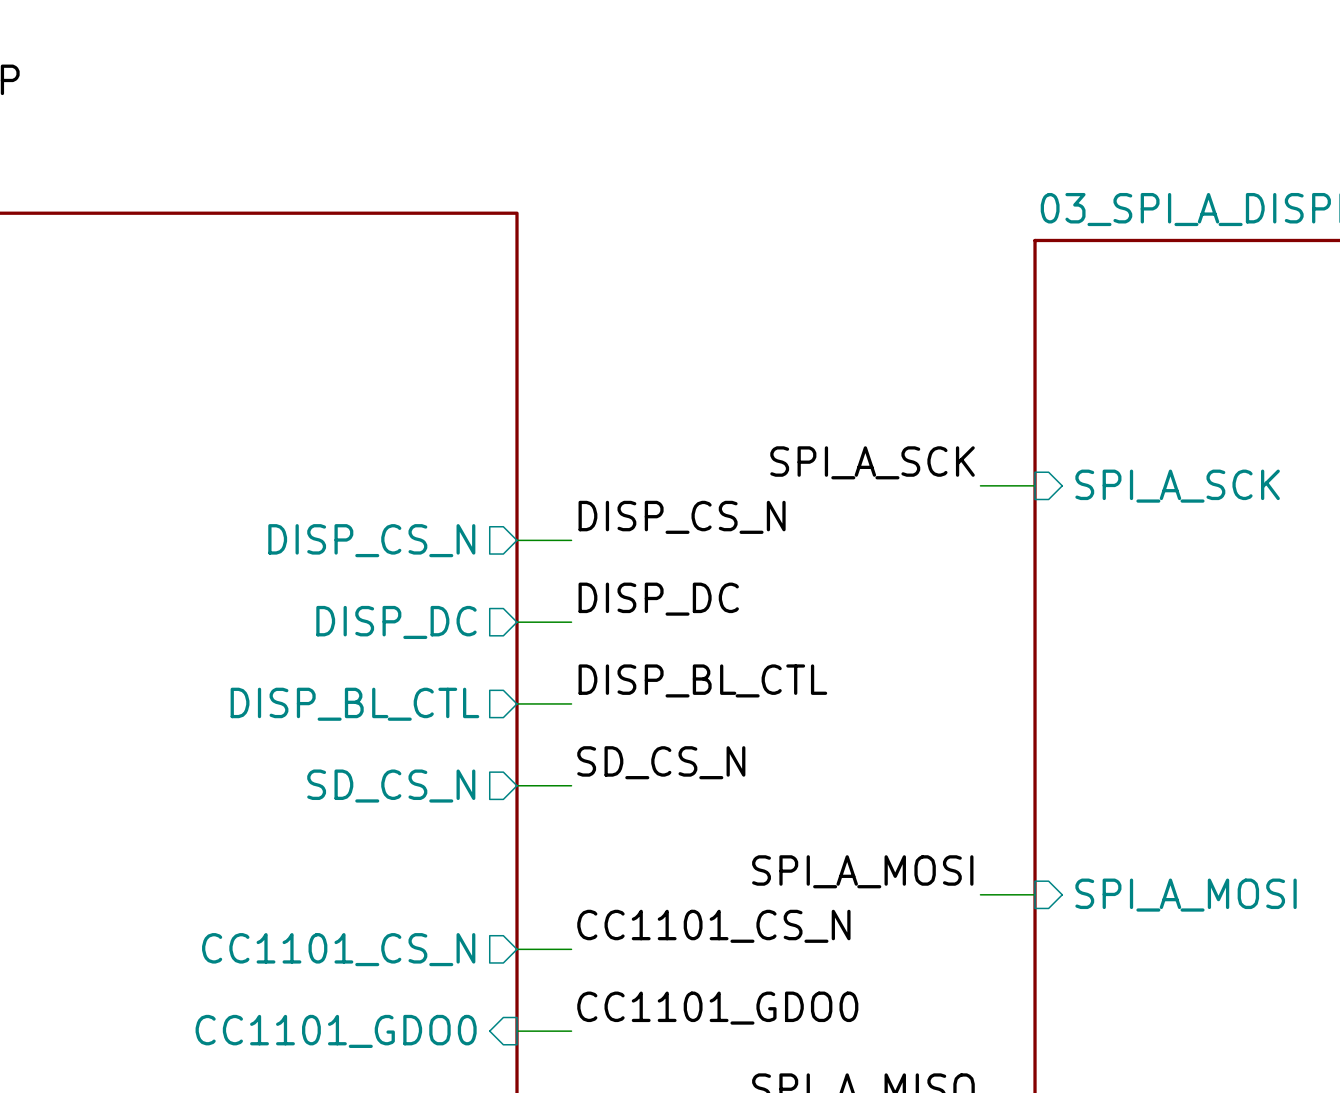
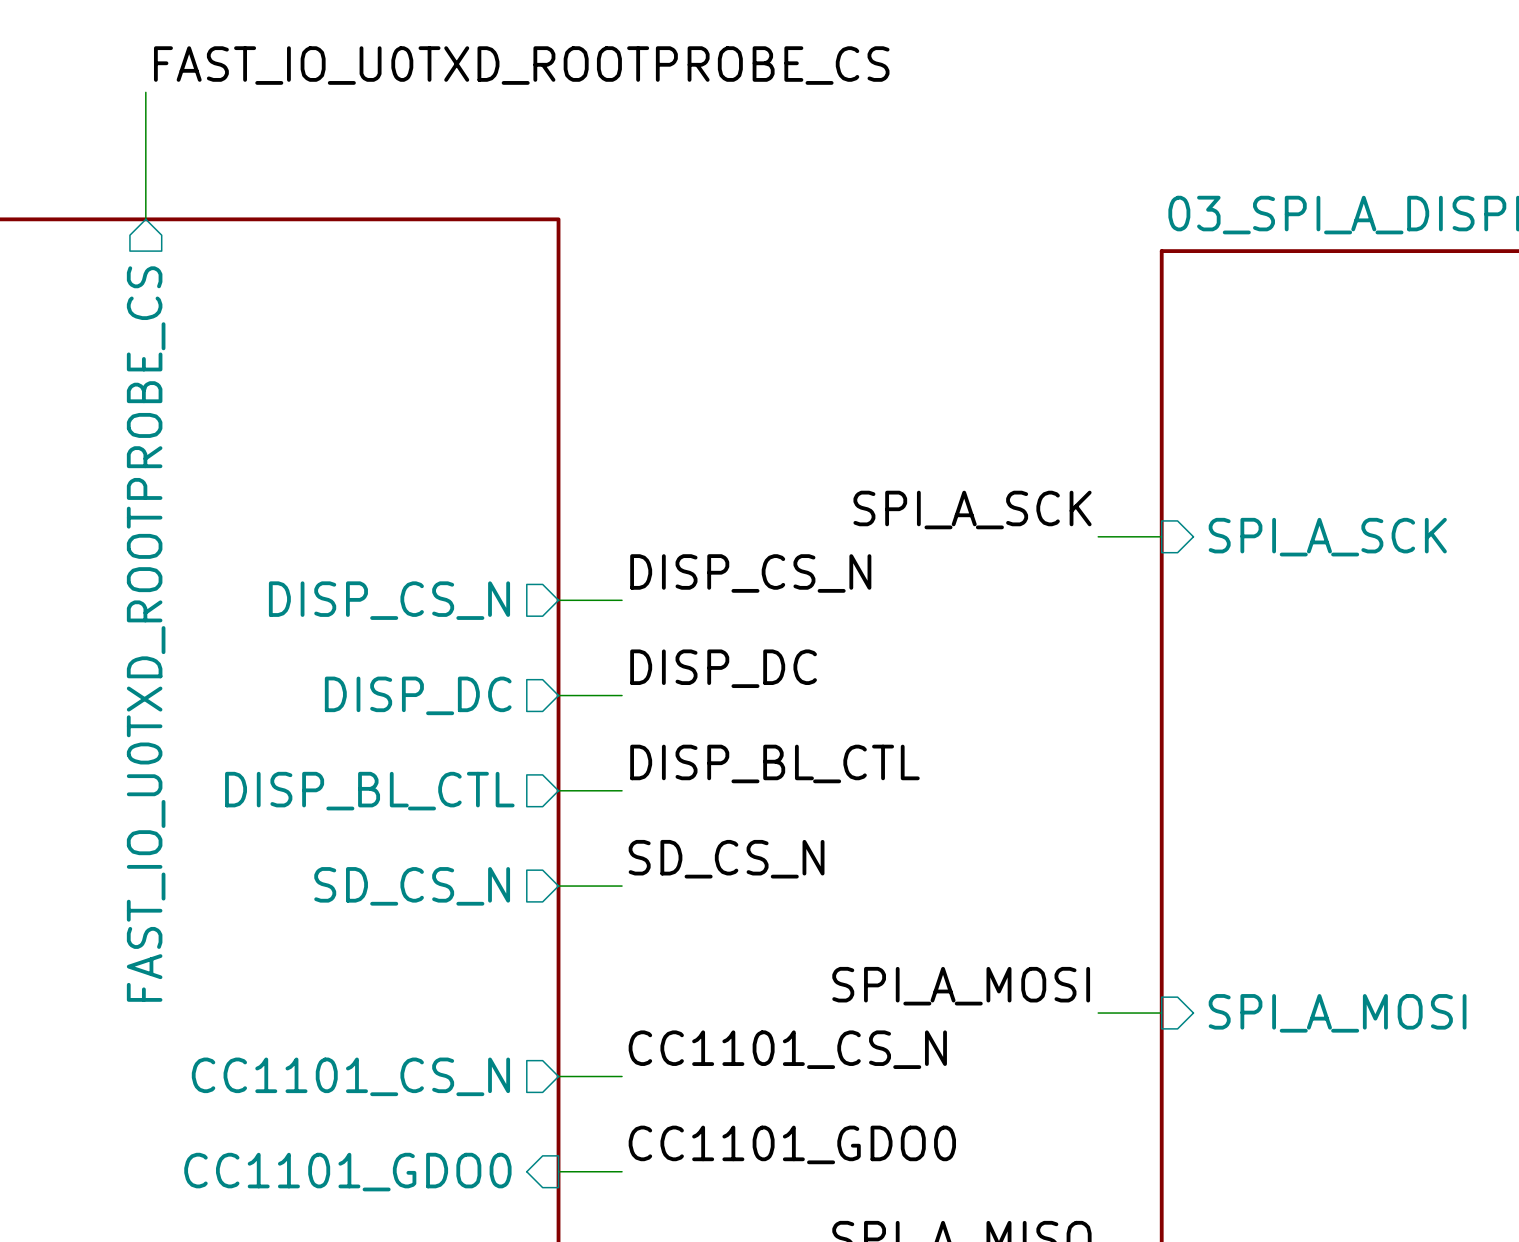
label: none -> FAST_IO_U0TXD_ROOTPROBE_CS (521, 65)
wire: none -> (145, 92) (145, 219)
sheet pin: none -> FAST_IO_U0TXD_ROOTPROBE_CS (146, 634)

